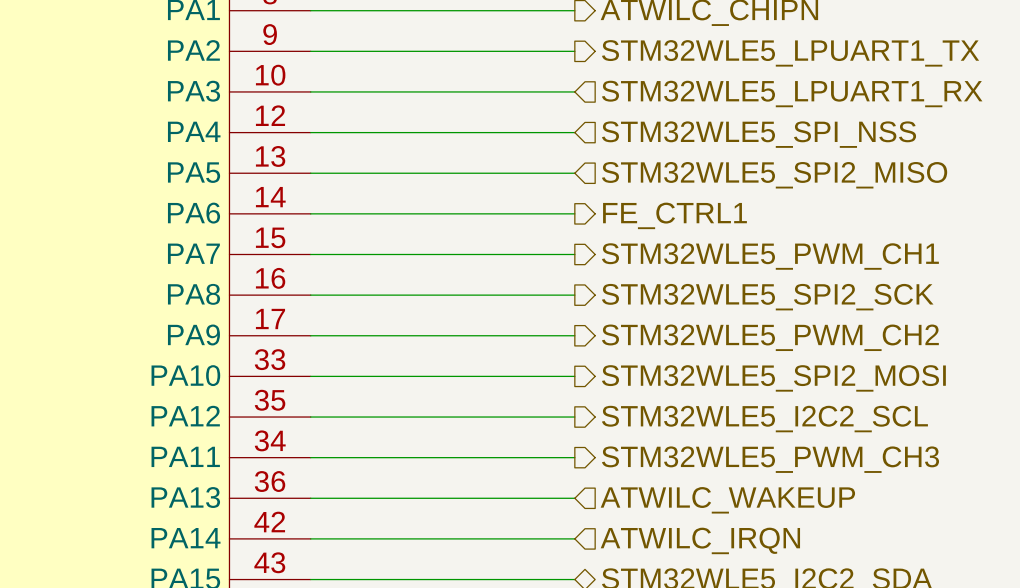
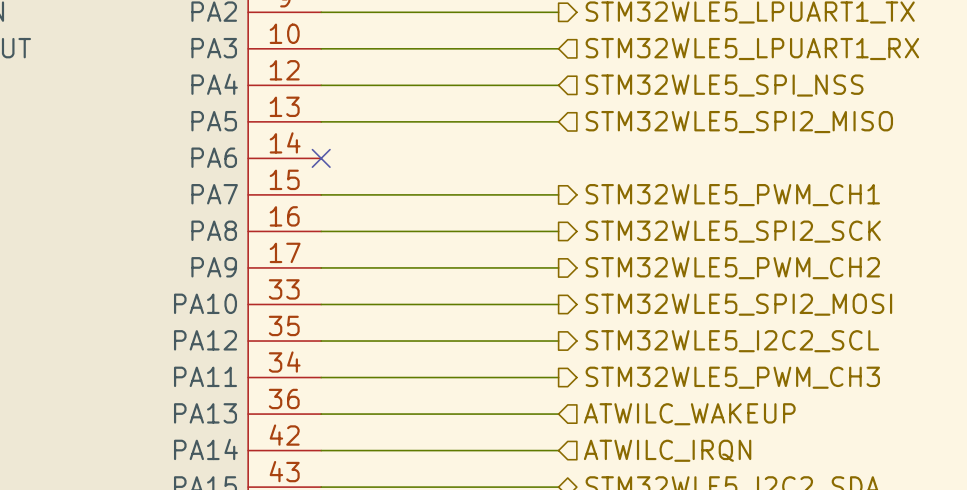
wire: (310, 213) (574, 213) -> none
no-connect mark: none -> (321, 158)
hierarchical label: FE_CTRL1 (674, 215) -> none

